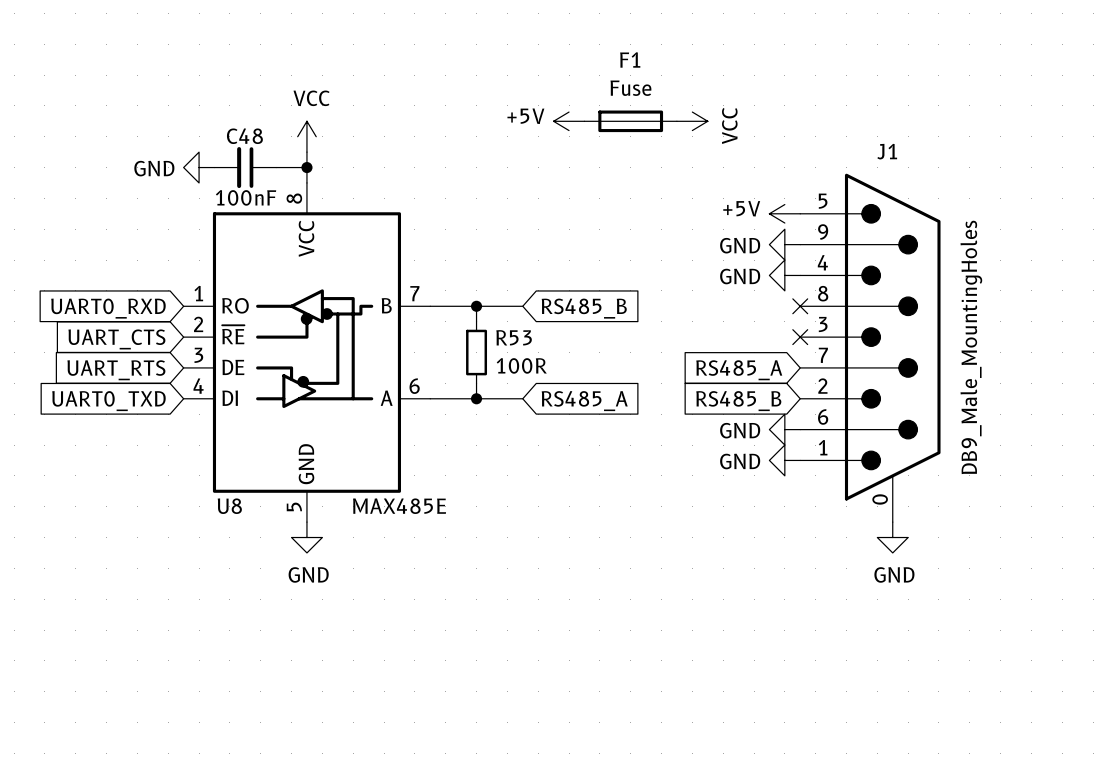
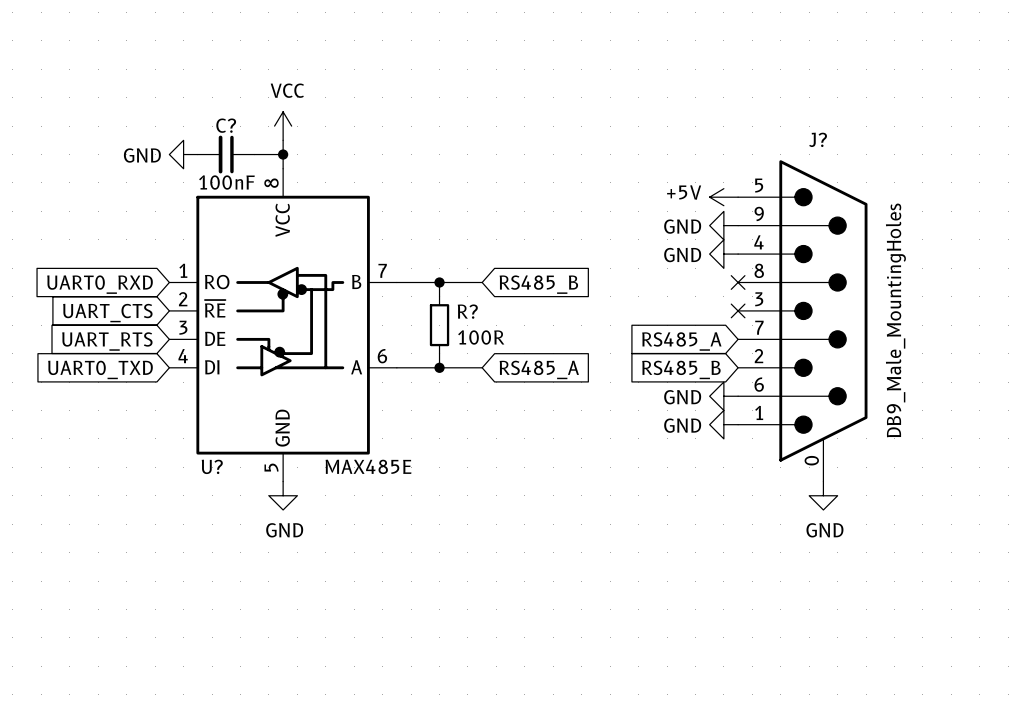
power symbol: +5V (569, 121) -> none
F1: Fuse (630, 121) -> none
power symbol: VCC (692, 121) -> none
C48 name: C48 (244, 136) -> C? (226, 125)
J1 name: J1 (887, 151) -> J? (818, 139)
R53 name: R53 (514, 337) -> R? (467, 311)
U8 name: U8 (229, 506) -> U? (212, 466)

